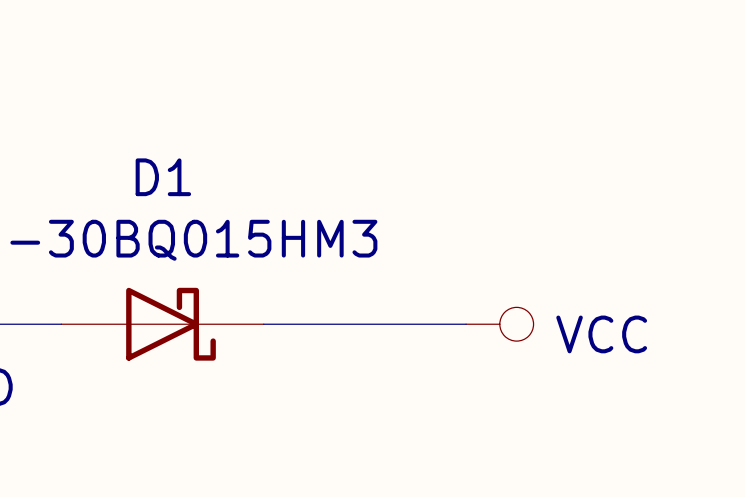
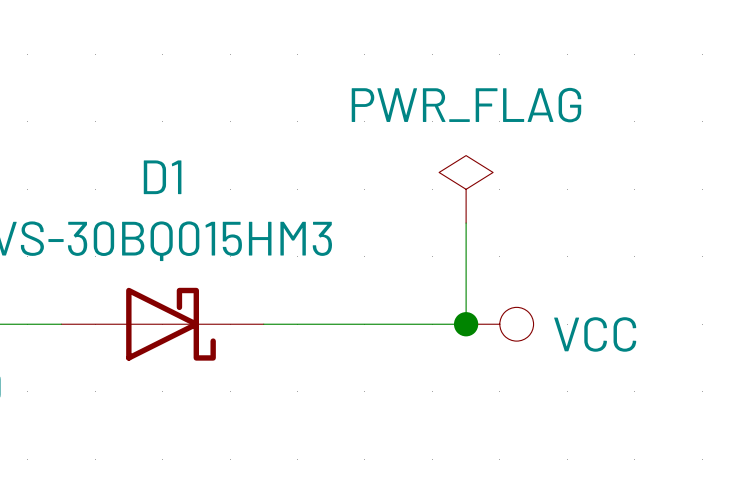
power symbol: none -> PWR_FLAG (466, 189)
wire: none -> (466, 223) (466, 324)
junction: none -> (466, 324)

